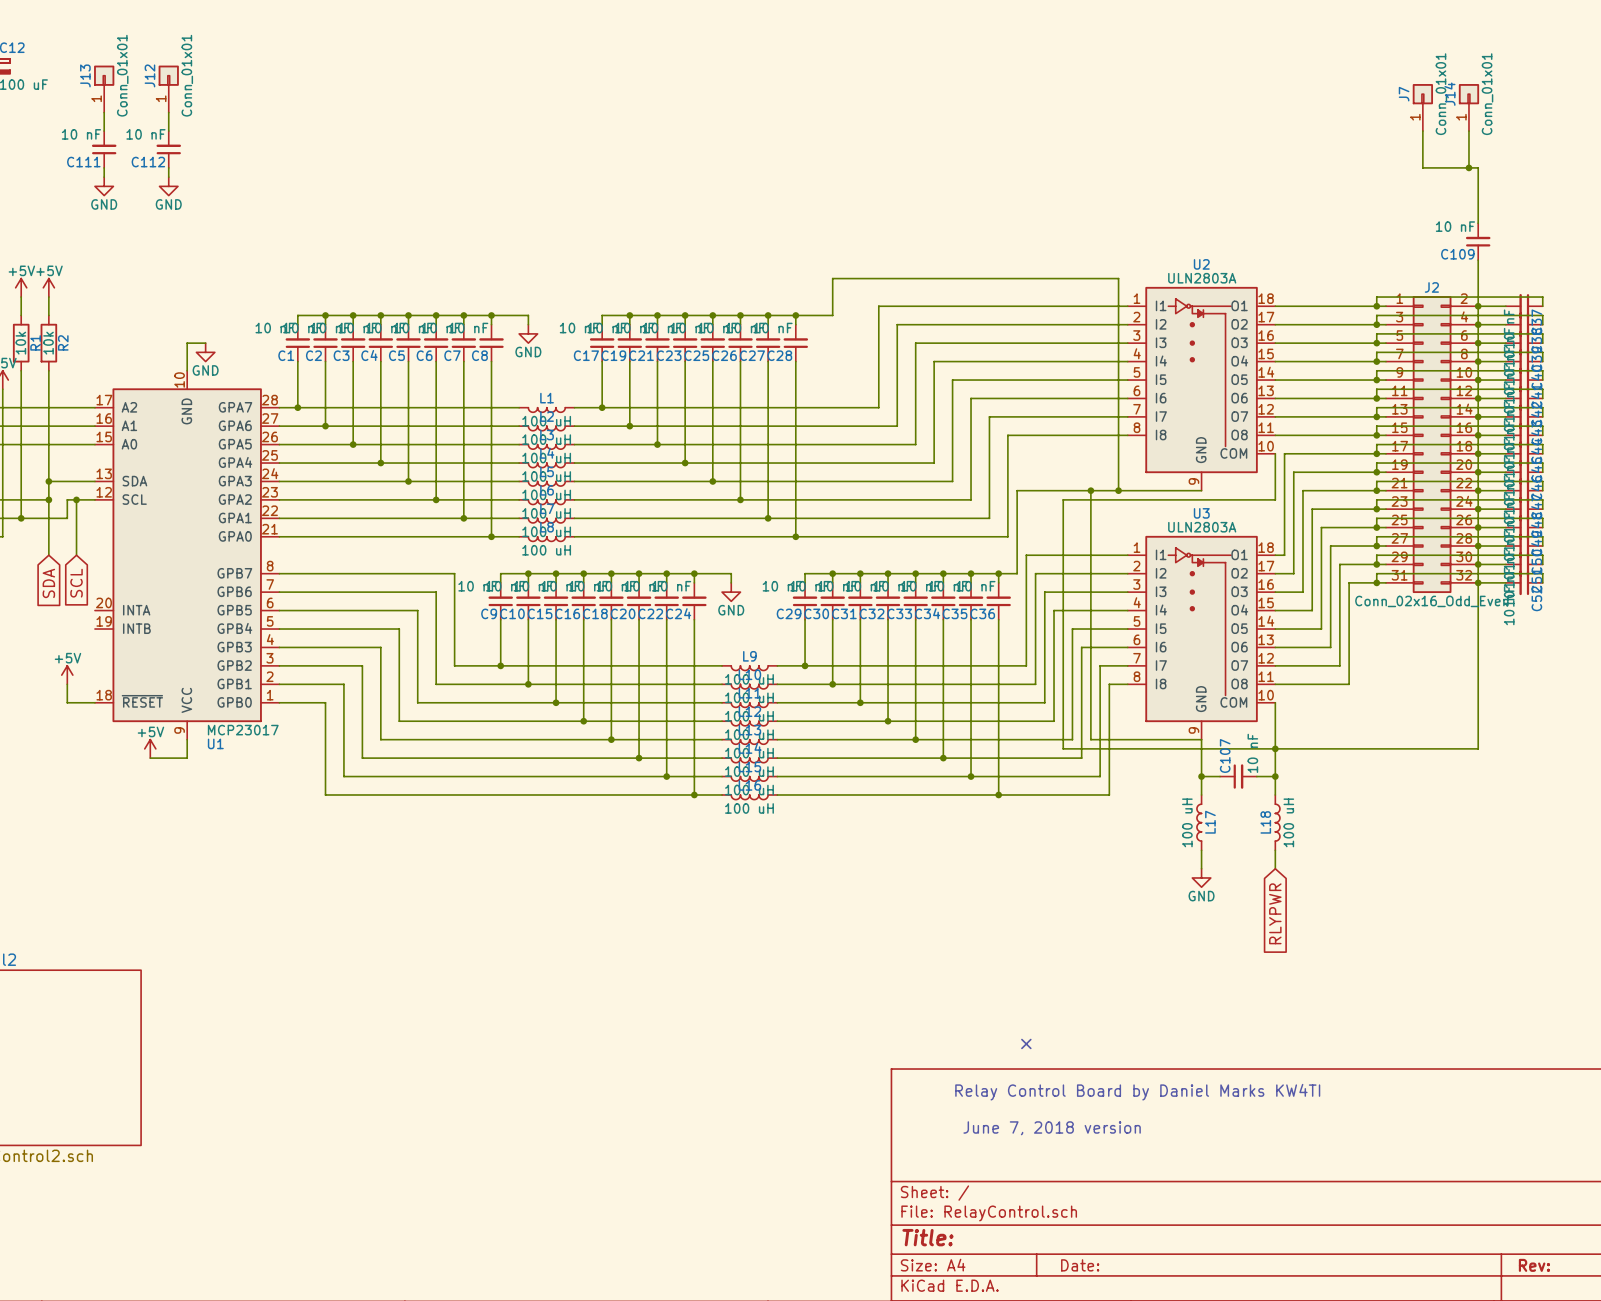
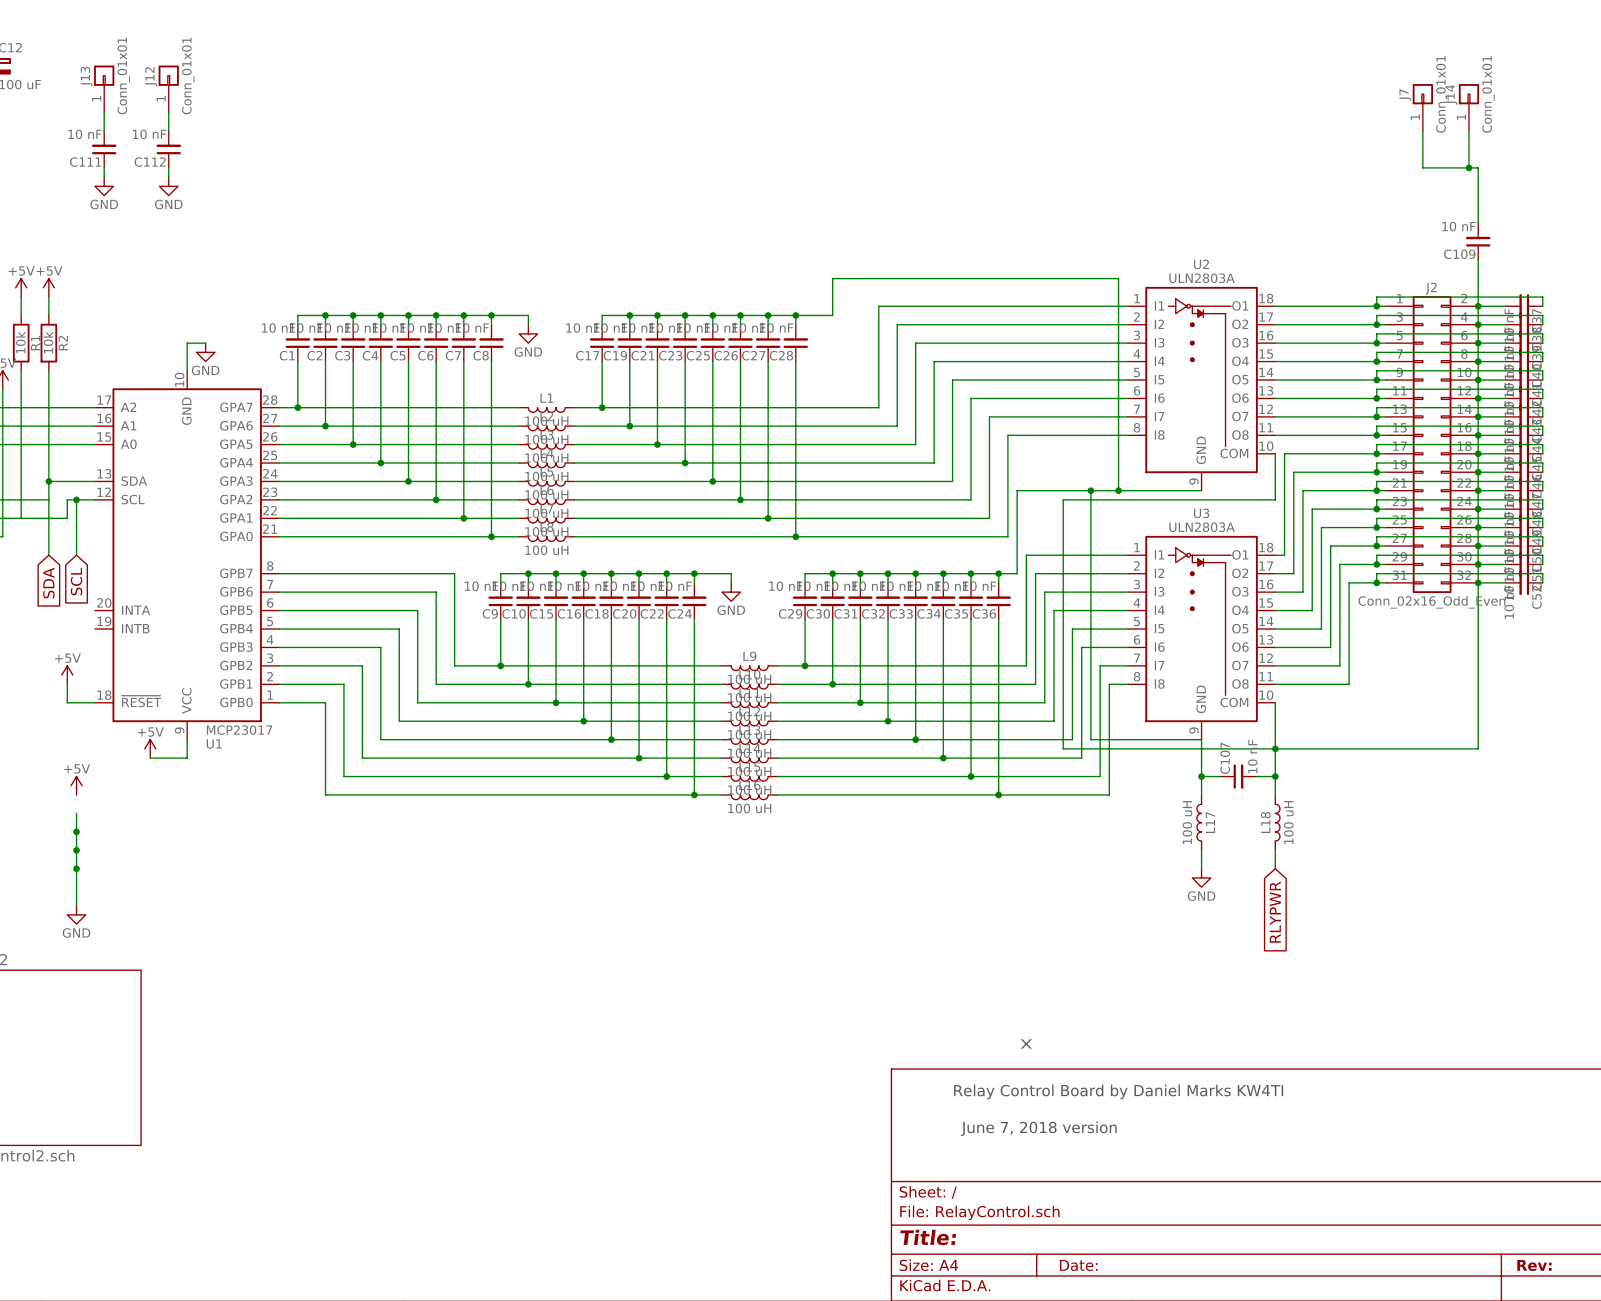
junction: (48, 499) -> none
junction: (21, 518) -> none
power symbol: none -> +5V (76, 785)
wire: none -> (76, 813) (76, 905)
junction: none -> (76, 831)
junction: none -> (76, 850)
junction: none -> (76, 868)
power symbol: none -> GND (76, 914)

